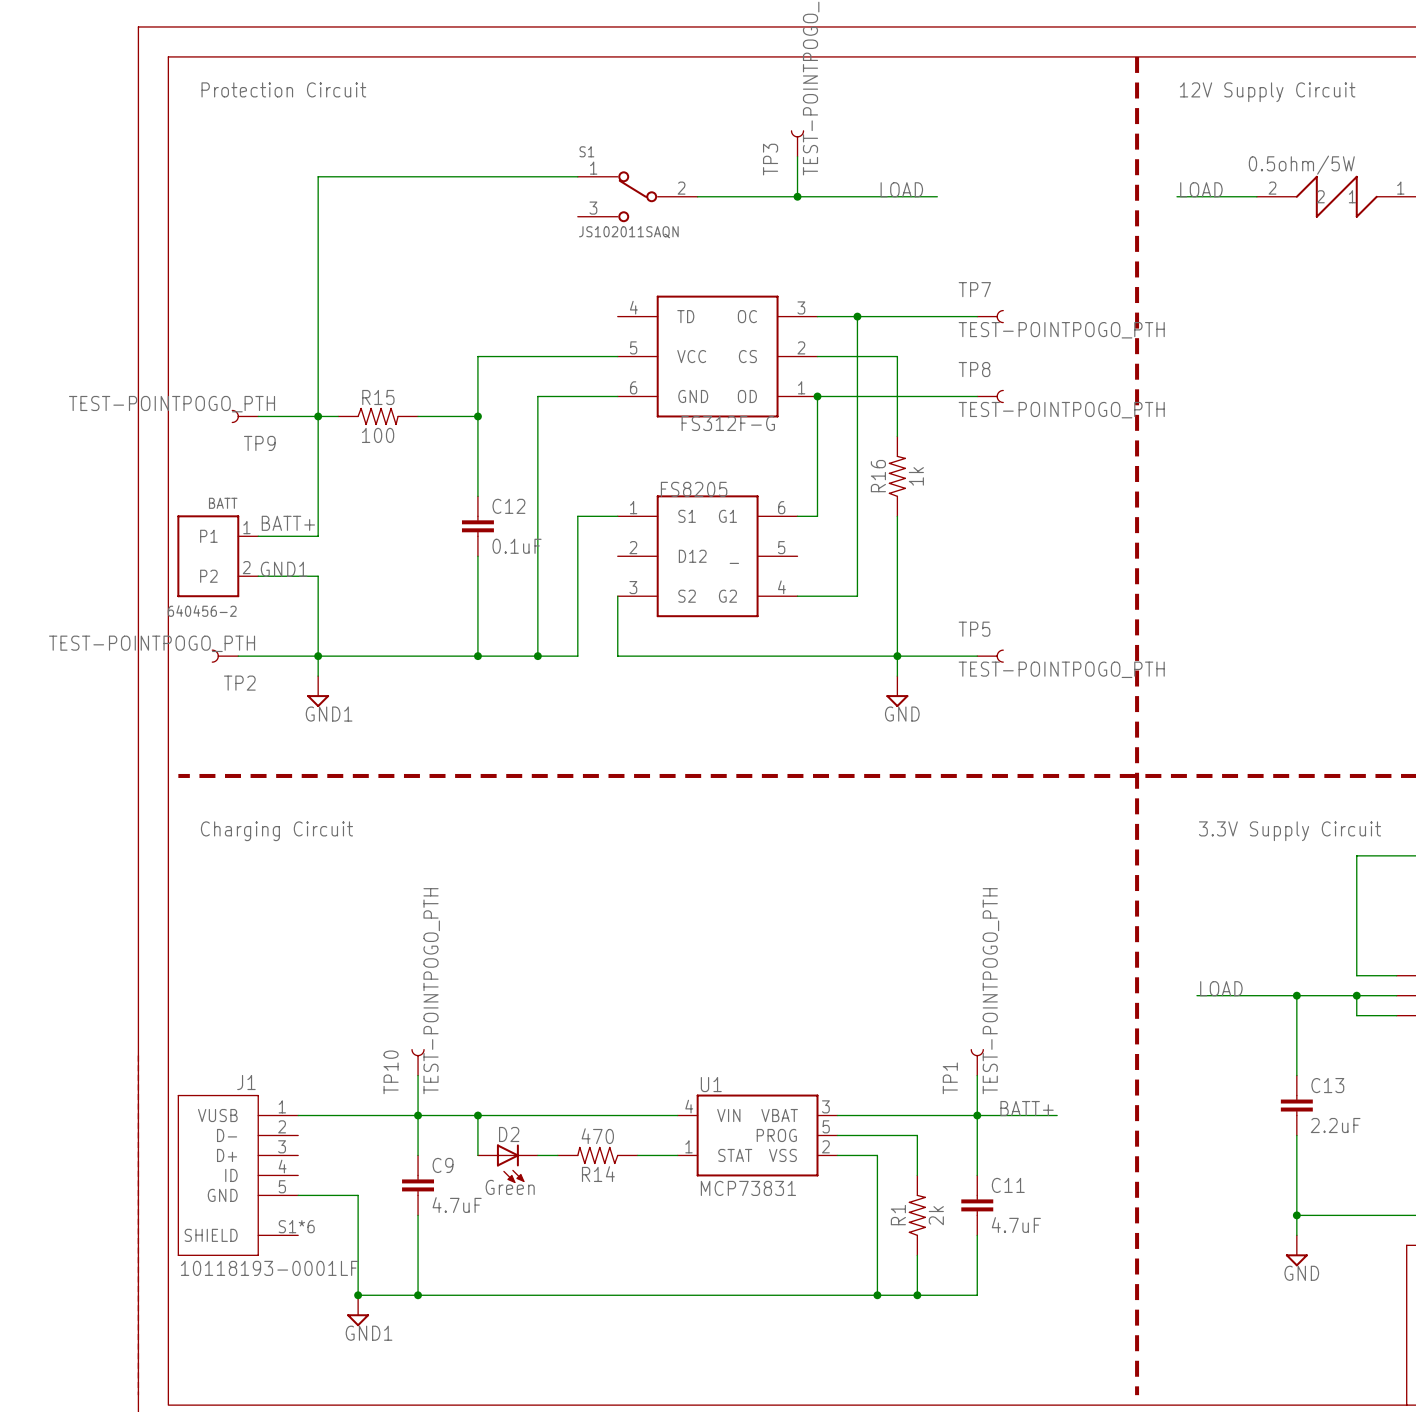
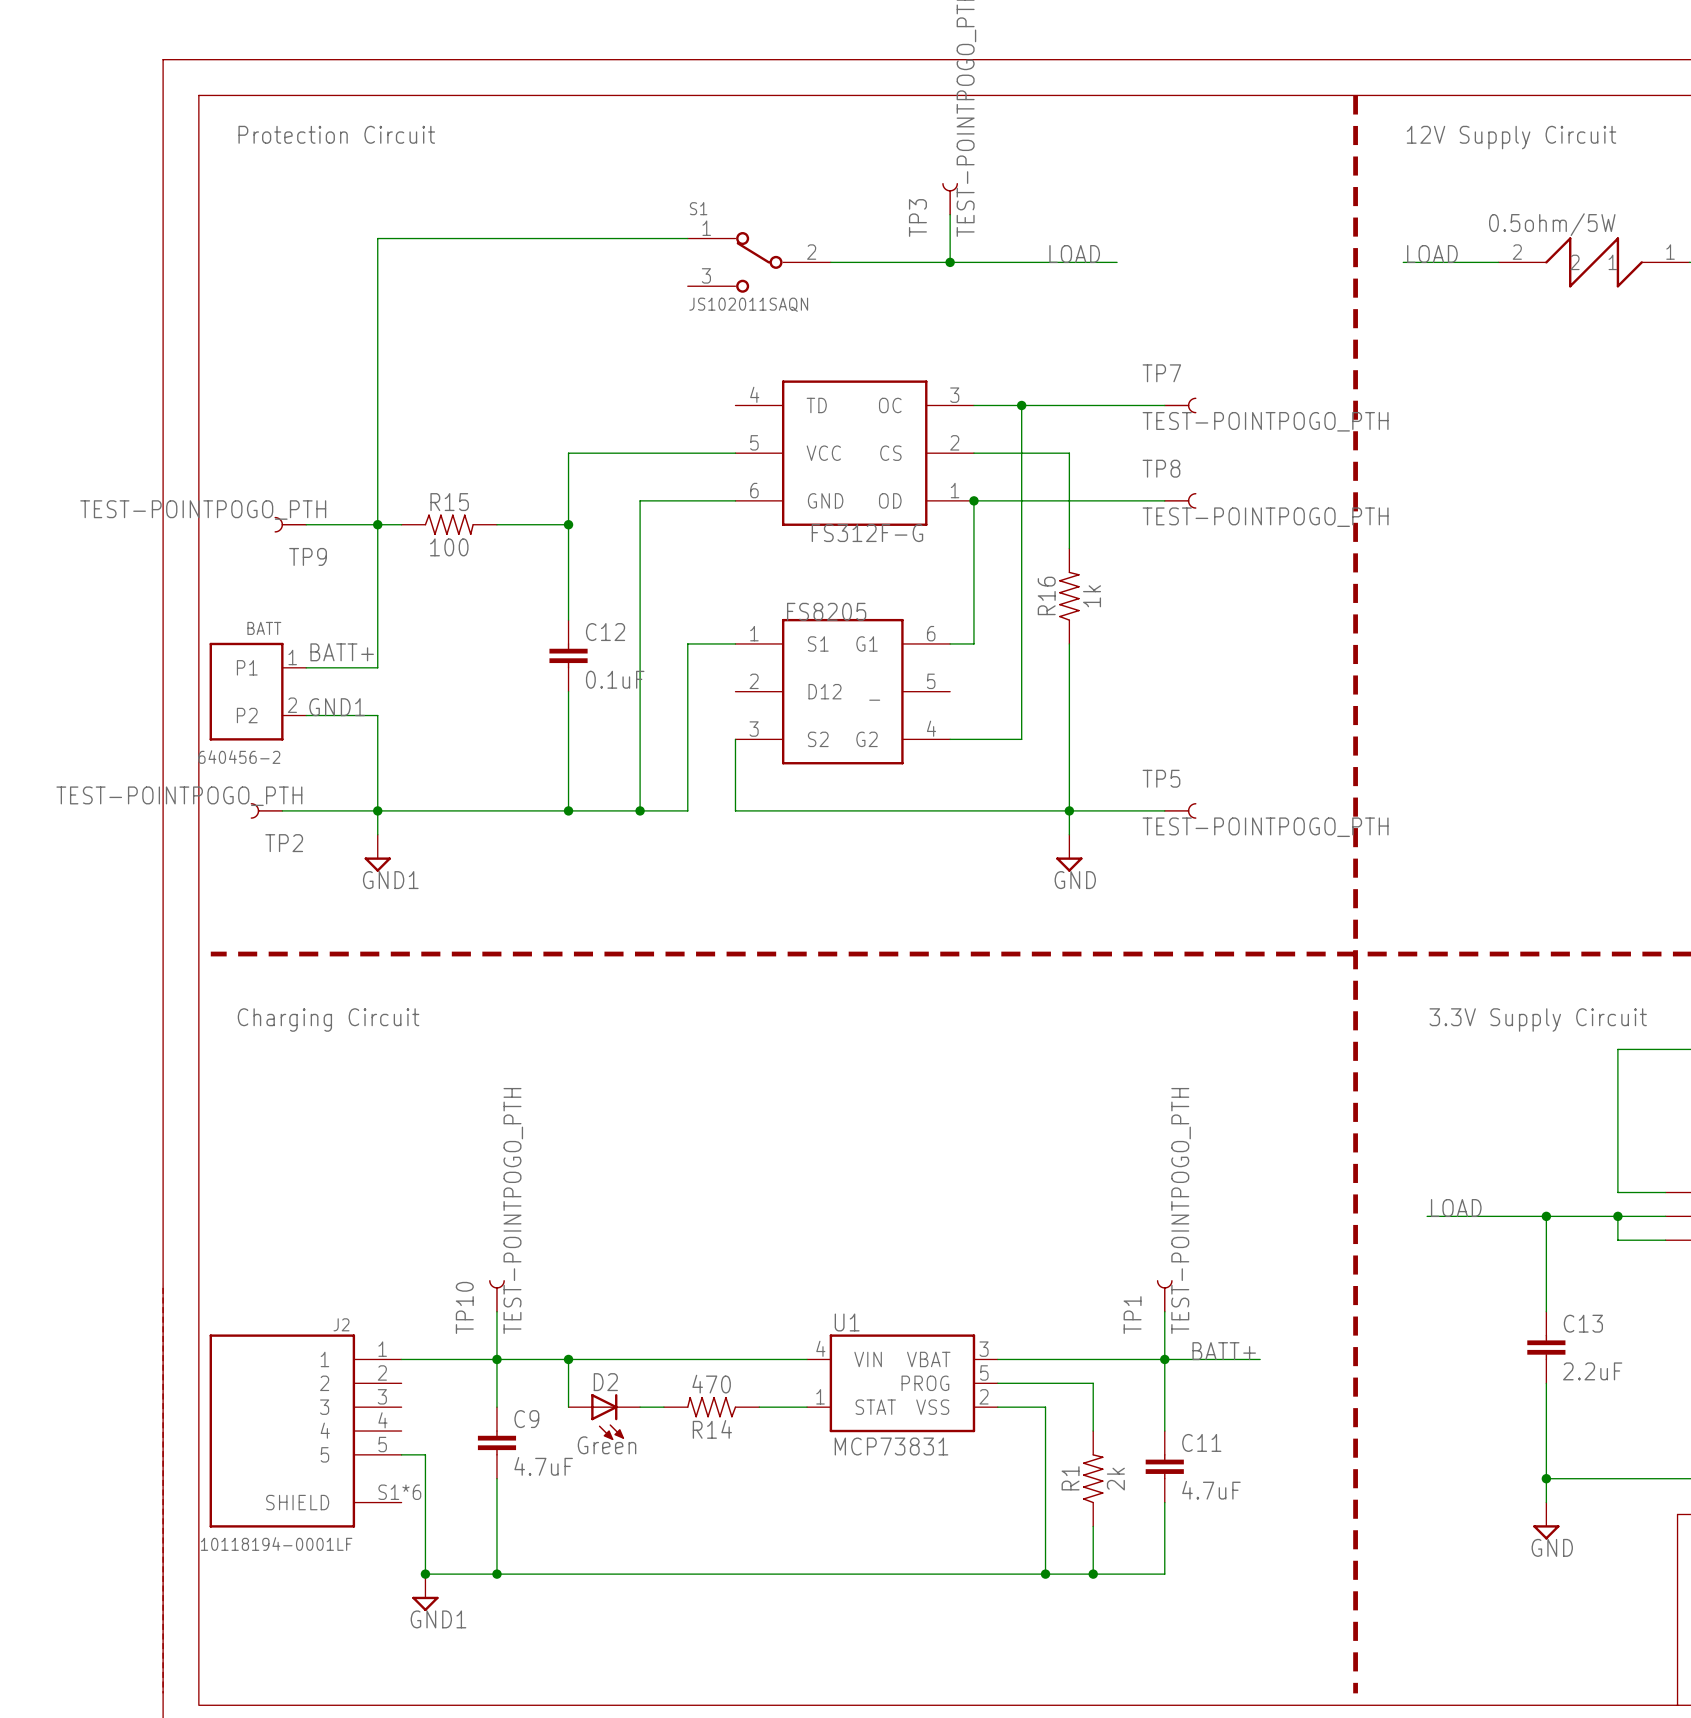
J1: 10118193-0001LF (237, 1175) -> none
J2: none -> 10118194-0001LF (305, 1431)

